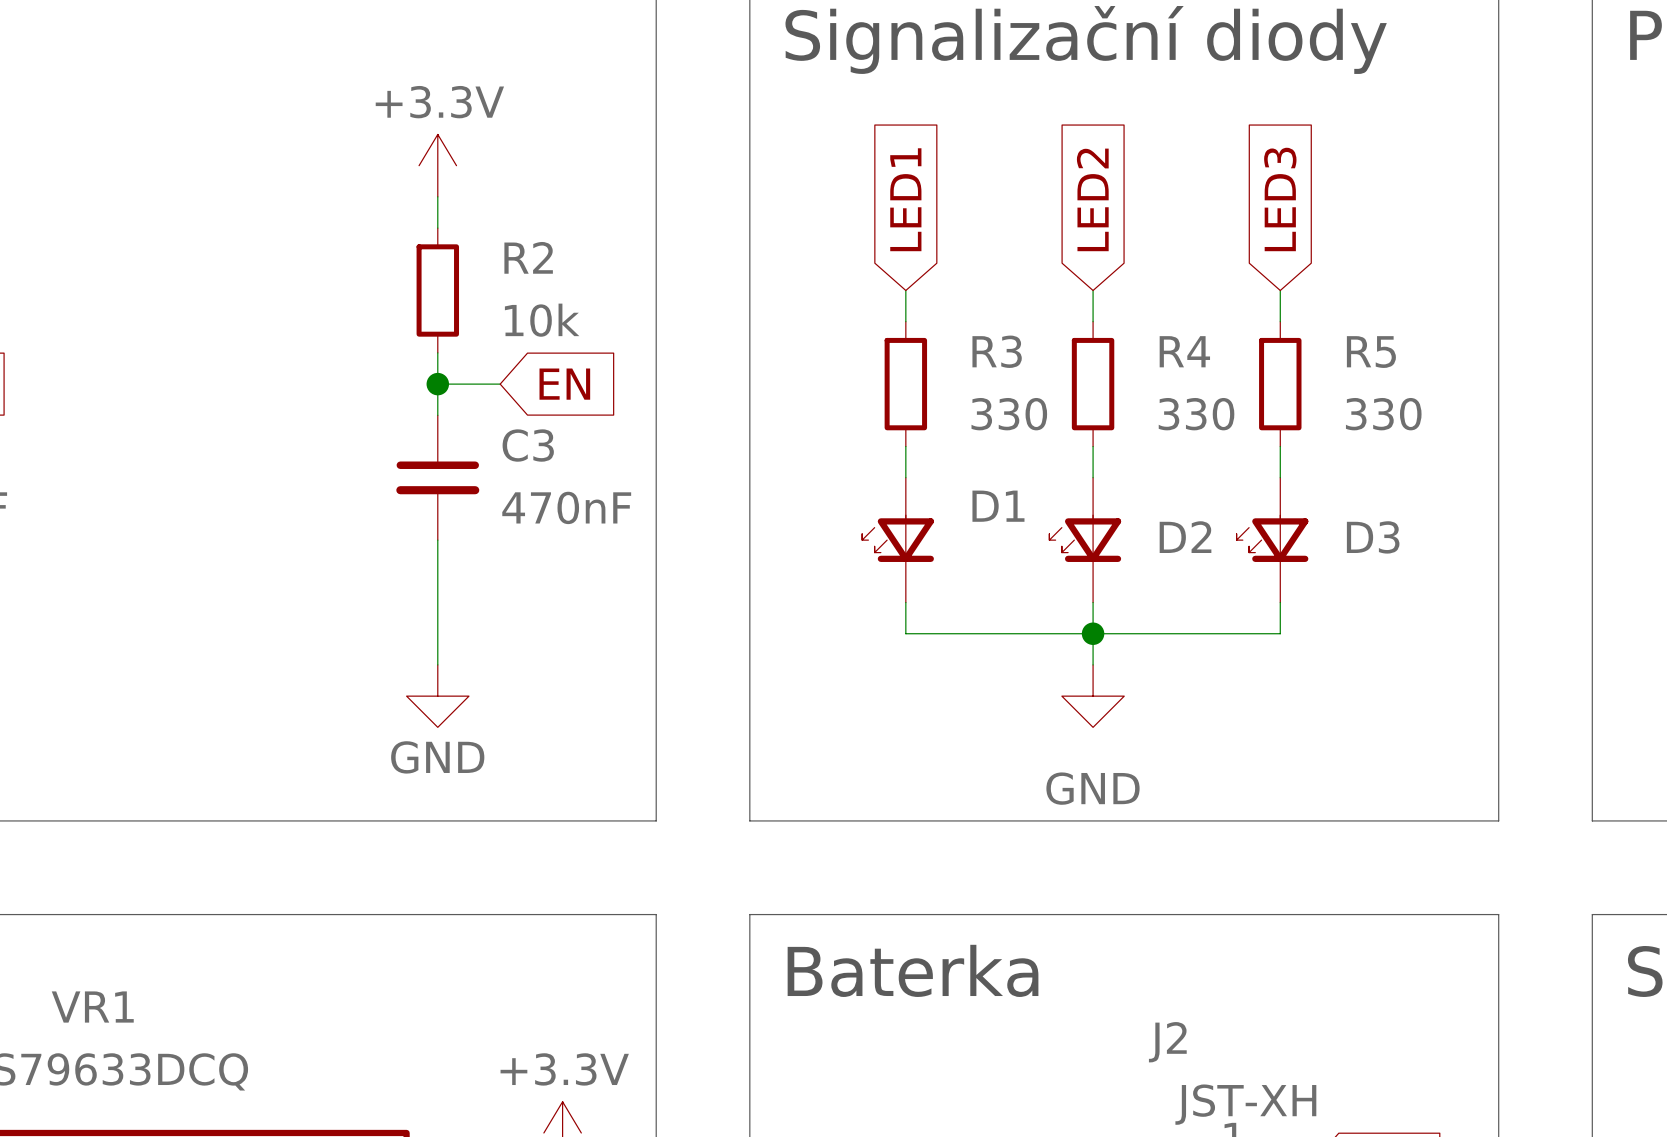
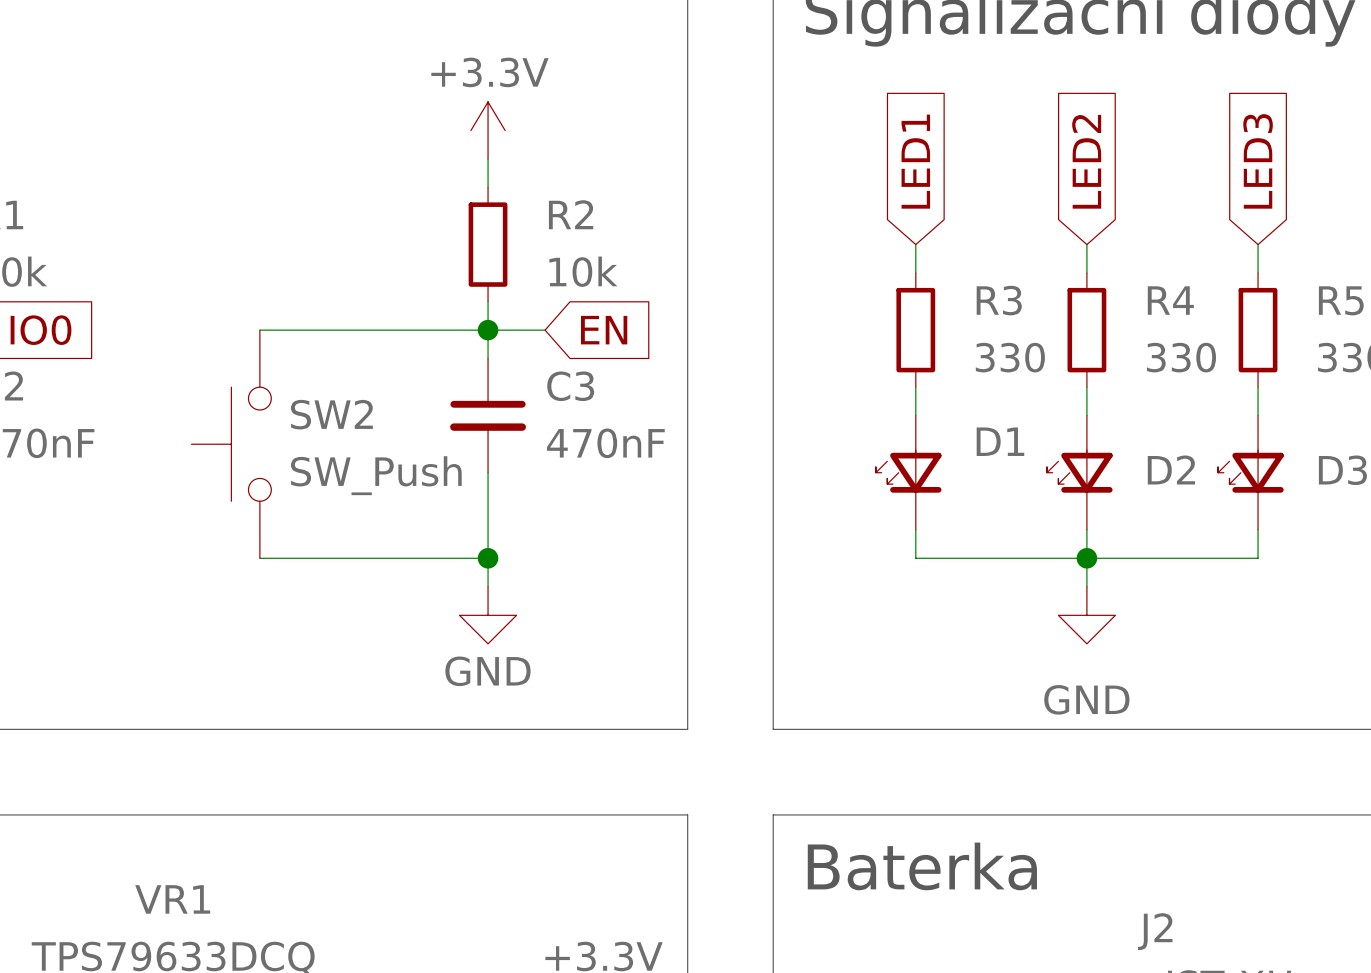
wire: none -> (259, 330) (488, 330)
SW2: none -> SW_Push (231, 444)
wire: none -> (259, 558) (488, 558)
junction: none -> (488, 558)

